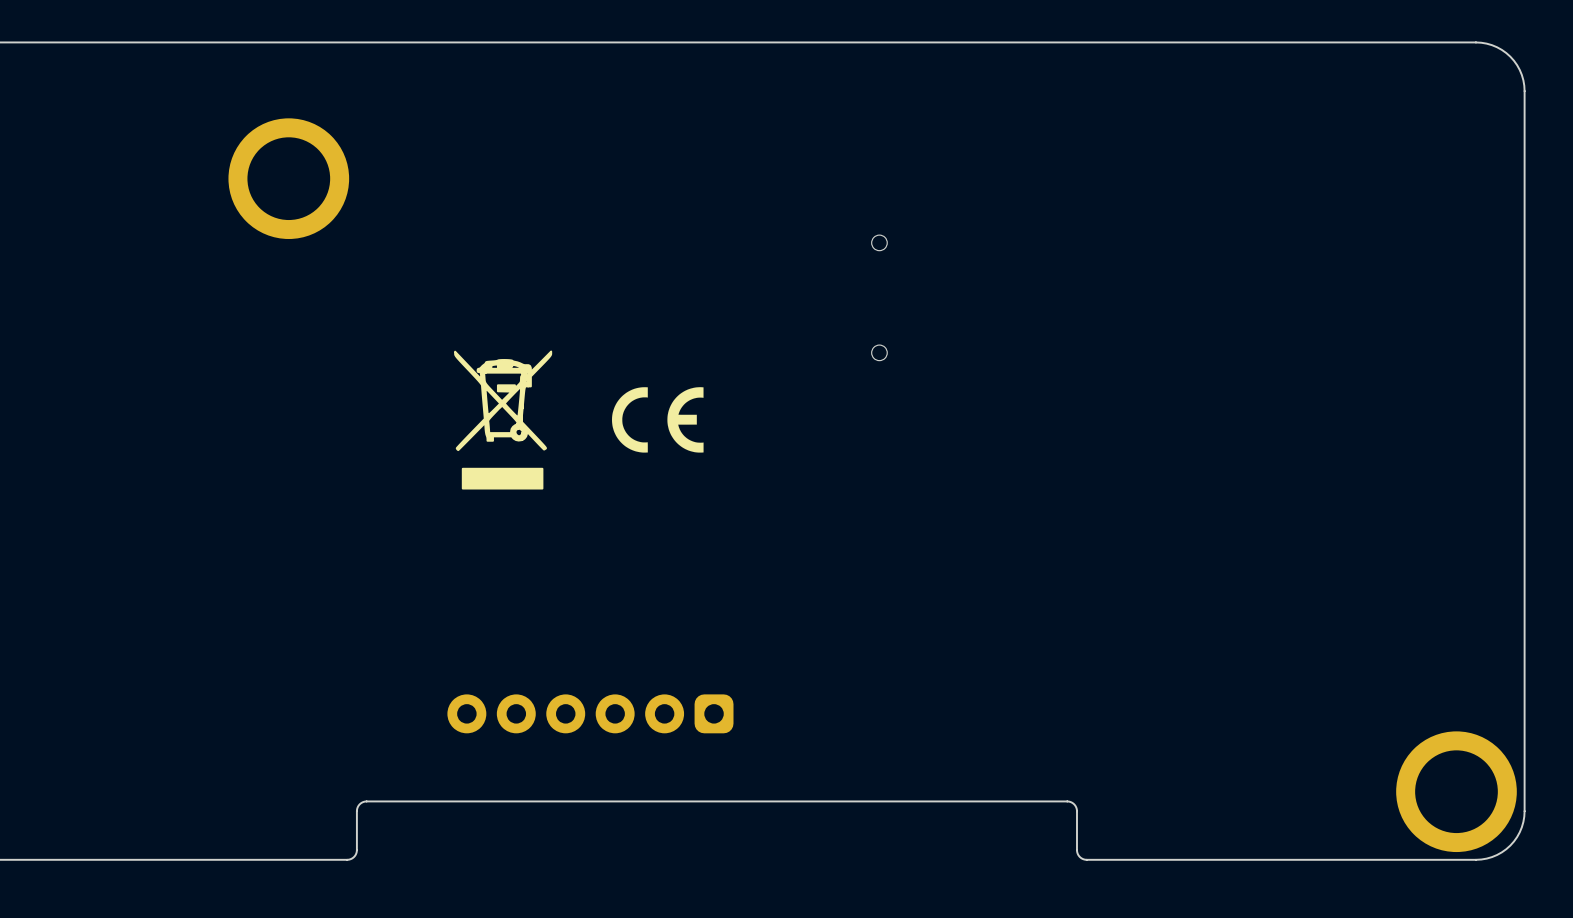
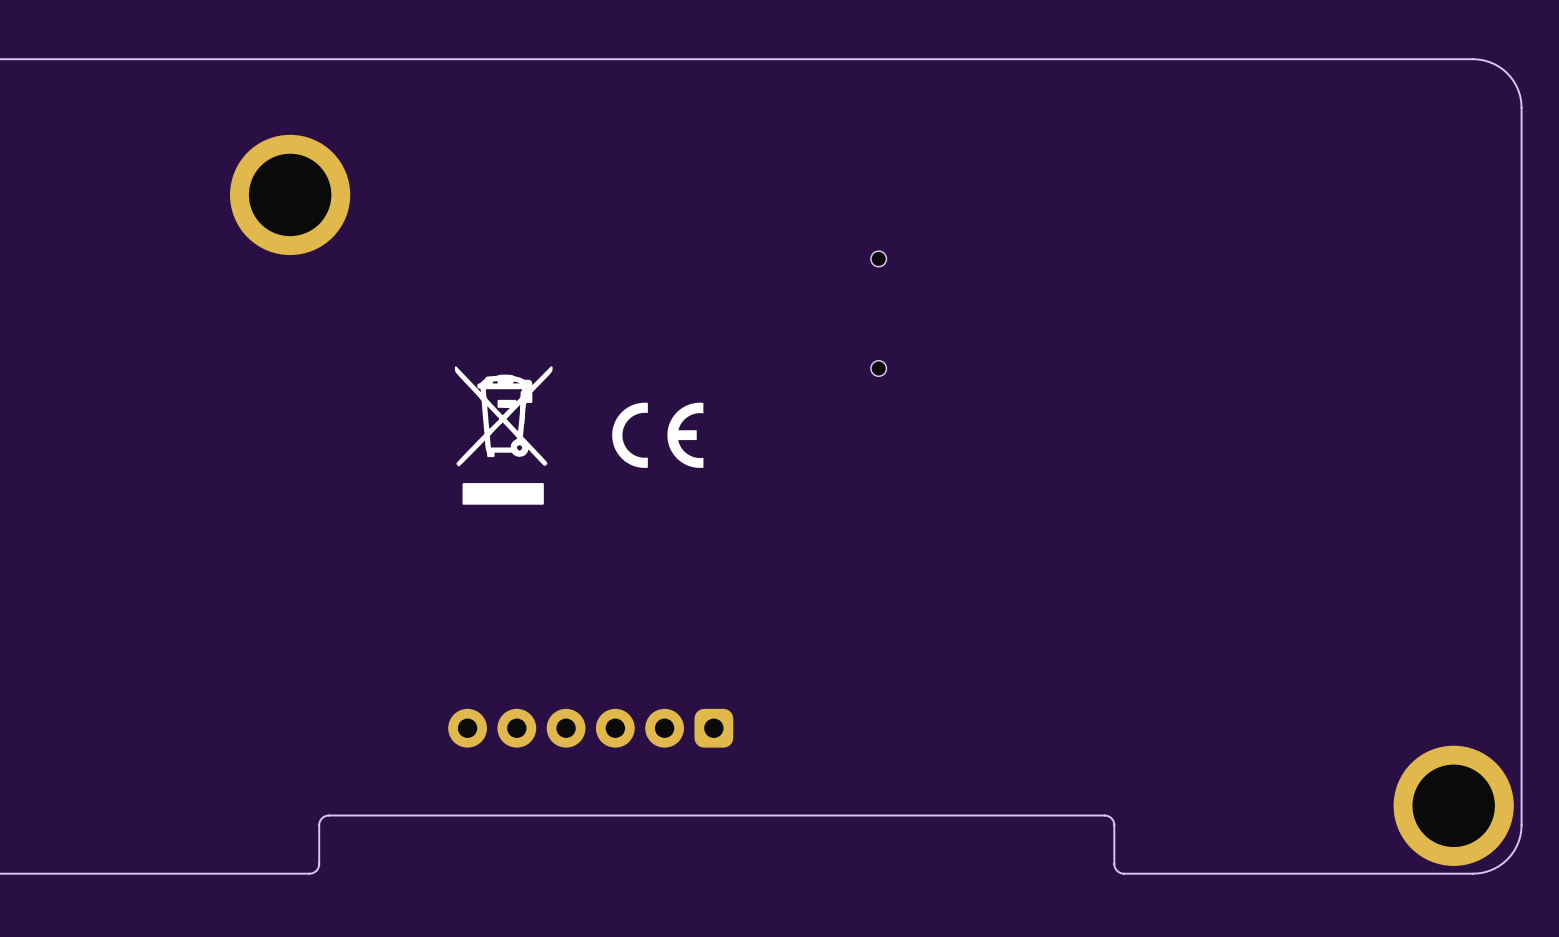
board edge: (366, 801) (360, 803) (357, 808) (356, 851) (354, 856) (347, 859) (308, 859) -> (367, 815) (328, 815) (322, 818) (319, 823) (318, 866) (315, 871) (309, 873)
board edge: (1067, 801) (1073, 803) (1076, 808) (1077, 851) (1079, 856) (1086, 859) (1125, 859) -> (1065, 815) (1104, 815) (1111, 818) (1114, 823) (1114, 866) (1118, 871) (1124, 873)

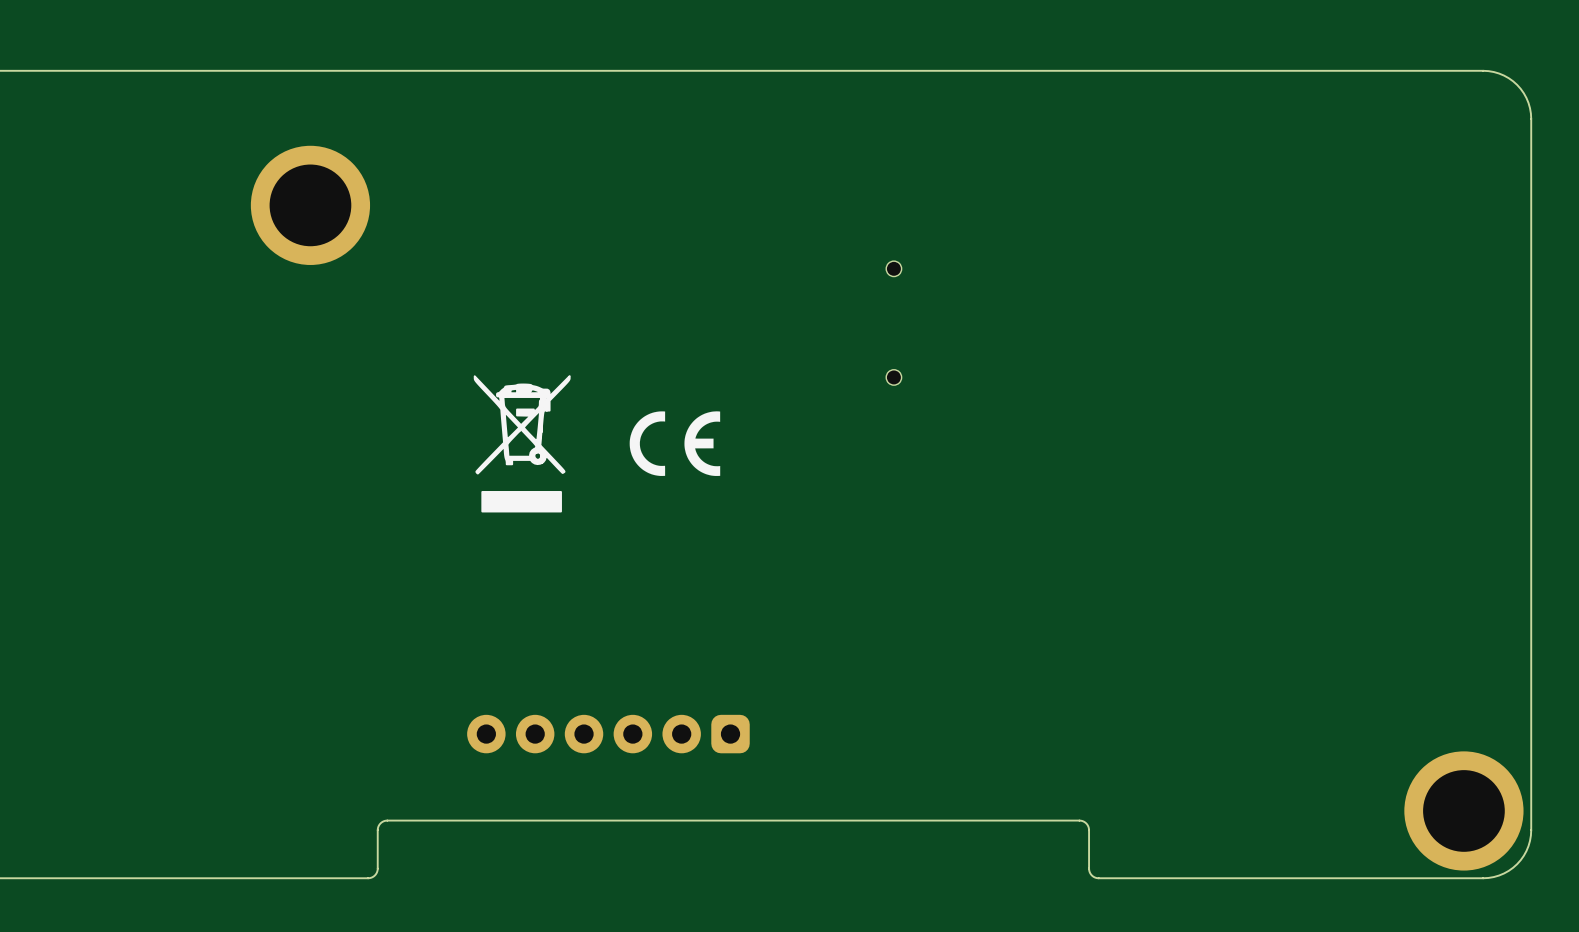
board edge: (367, 815) (328, 815) (322, 818) (319, 823) (318, 866) (315, 871) (309, 873) -> (387, 820) (381, 822) (378, 827) (377, 869) (374, 875) (368, 878) (329, 878)
board edge: (1065, 815) (1104, 815) (1111, 818) (1114, 823) (1114, 866) (1118, 871) (1124, 873) -> (1079, 820) (1085, 822) (1088, 827) (1089, 869) (1091, 875) (1098, 878) (1137, 878)

